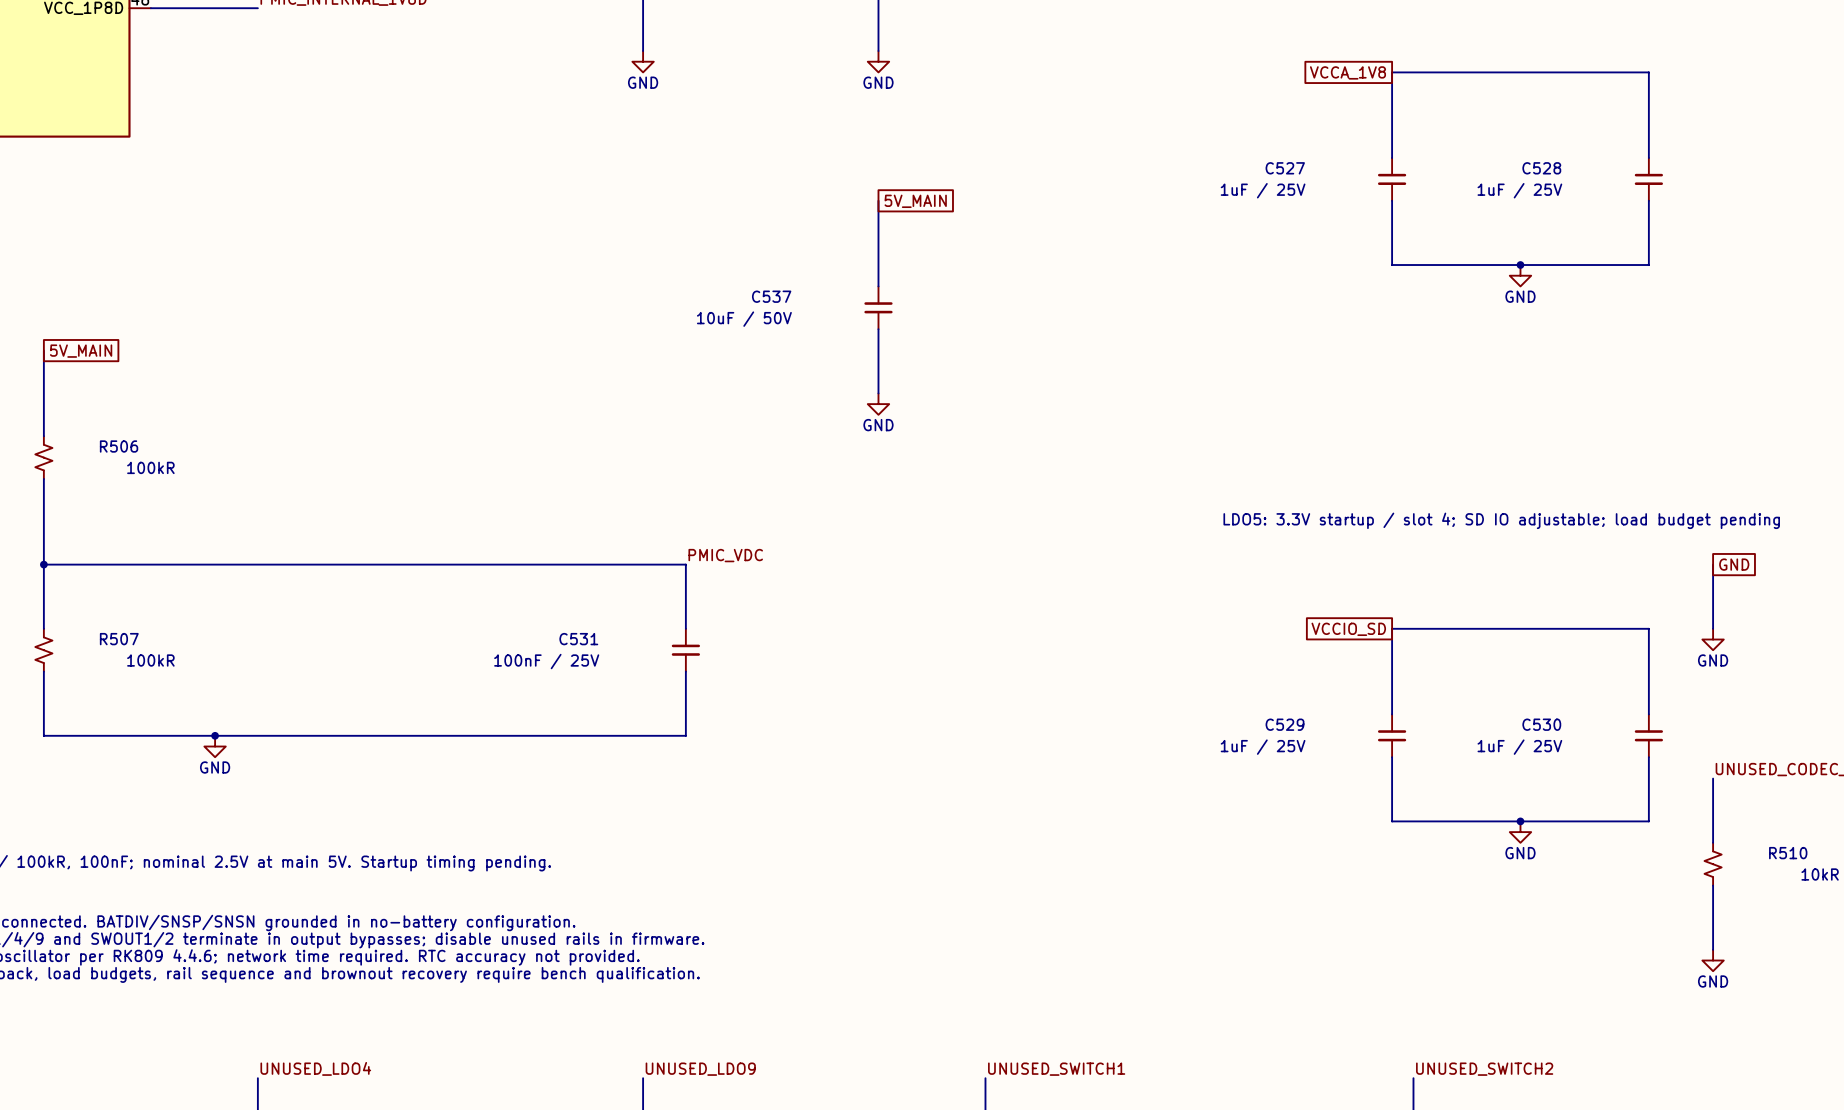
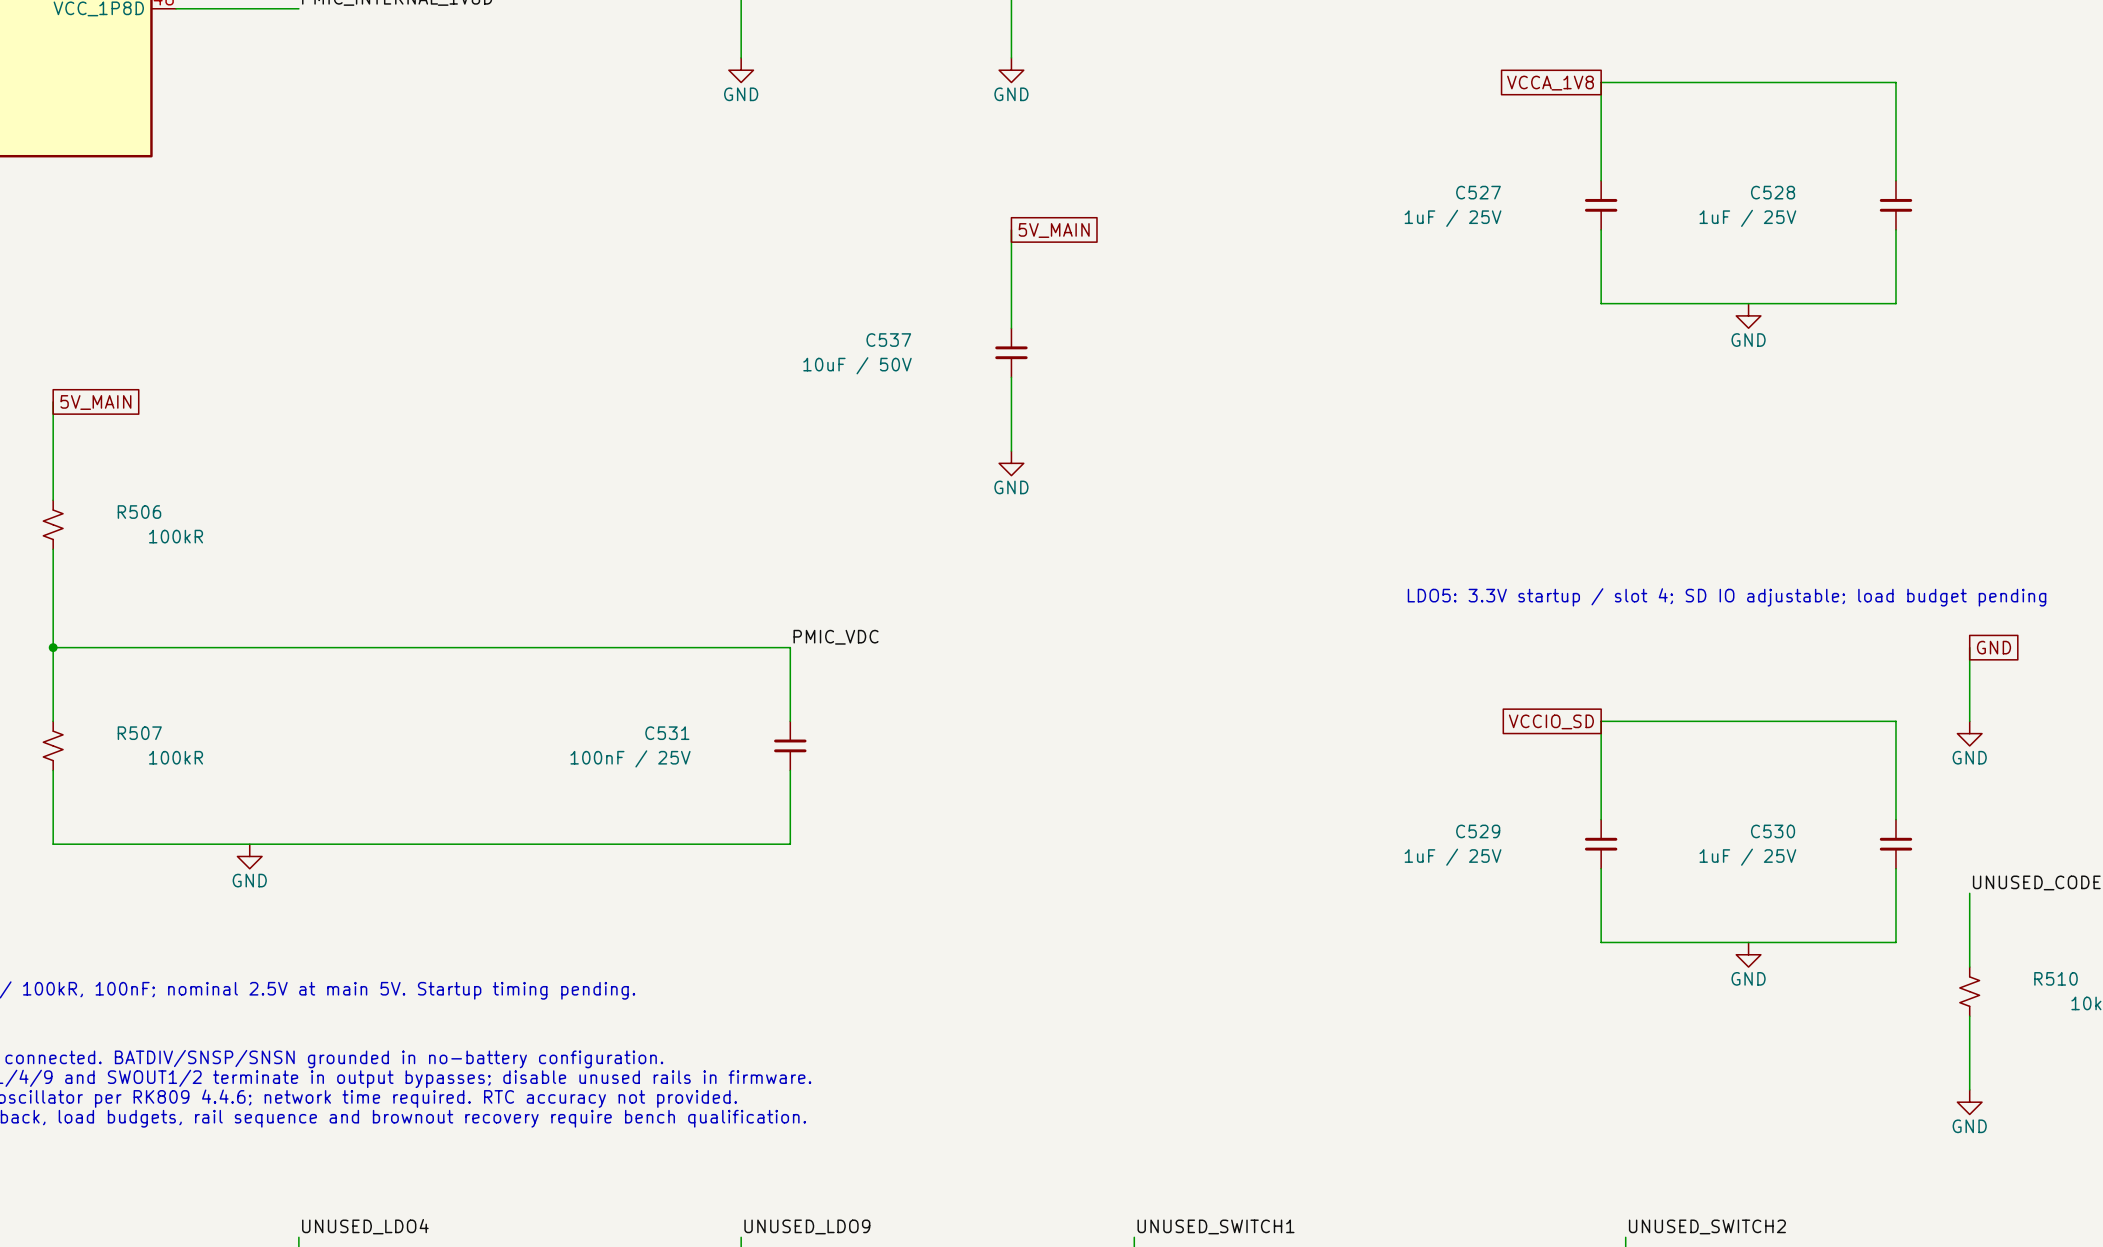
junction: (1520, 265) -> none
junction: (215, 735) -> none
junction: (1520, 821) -> none

